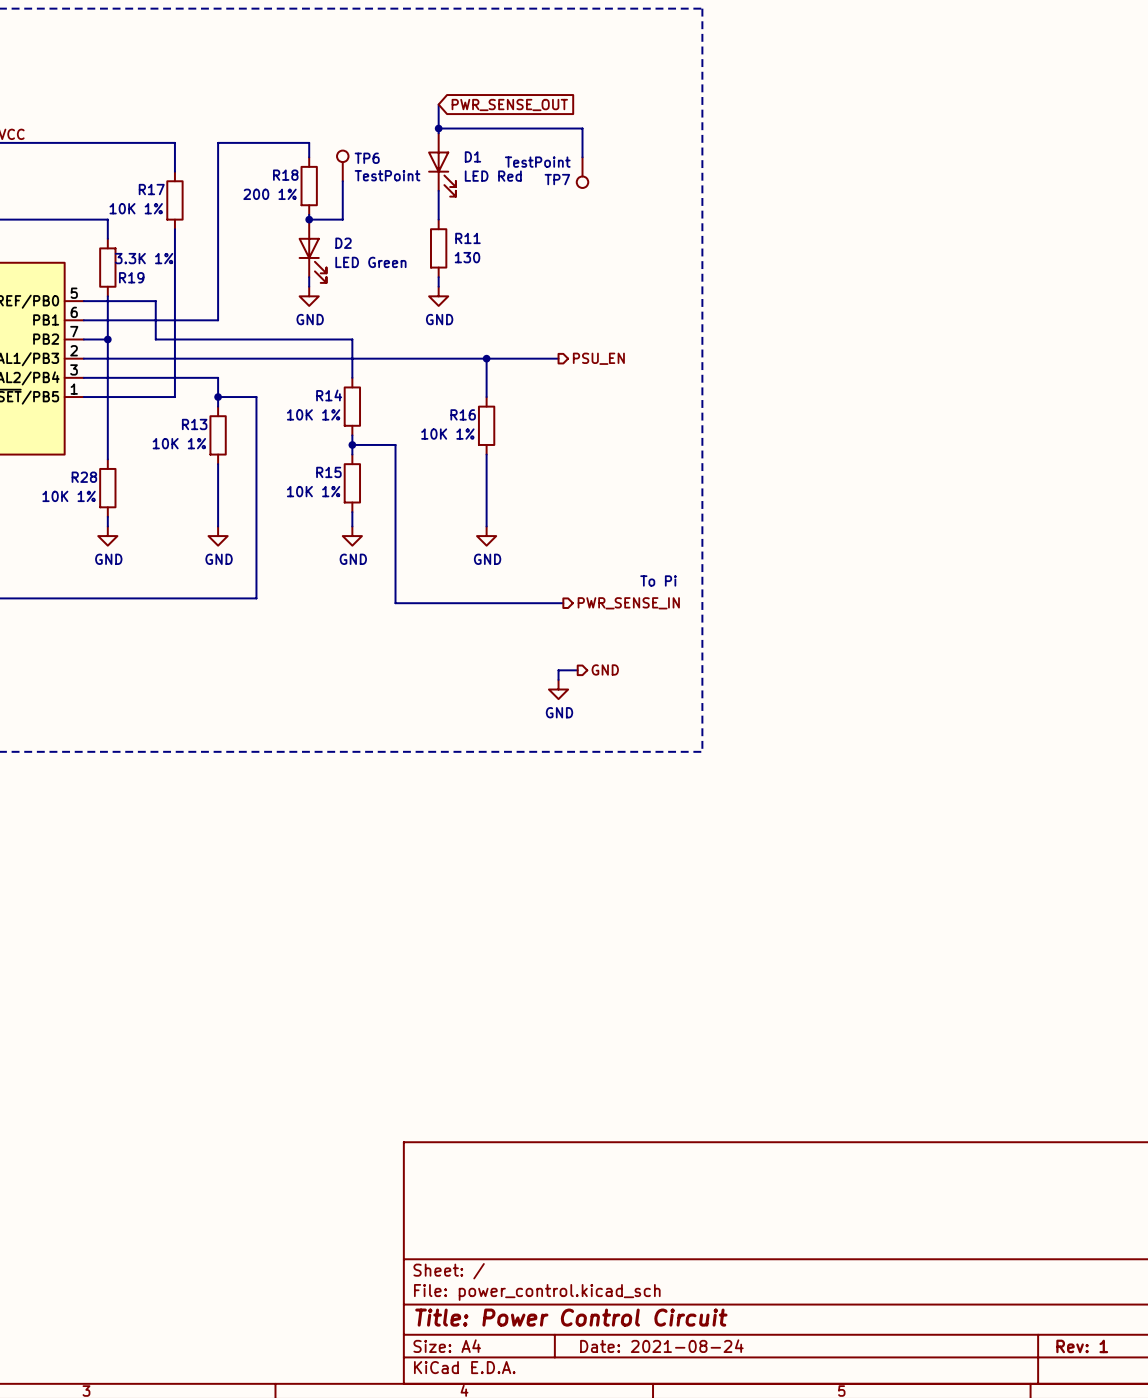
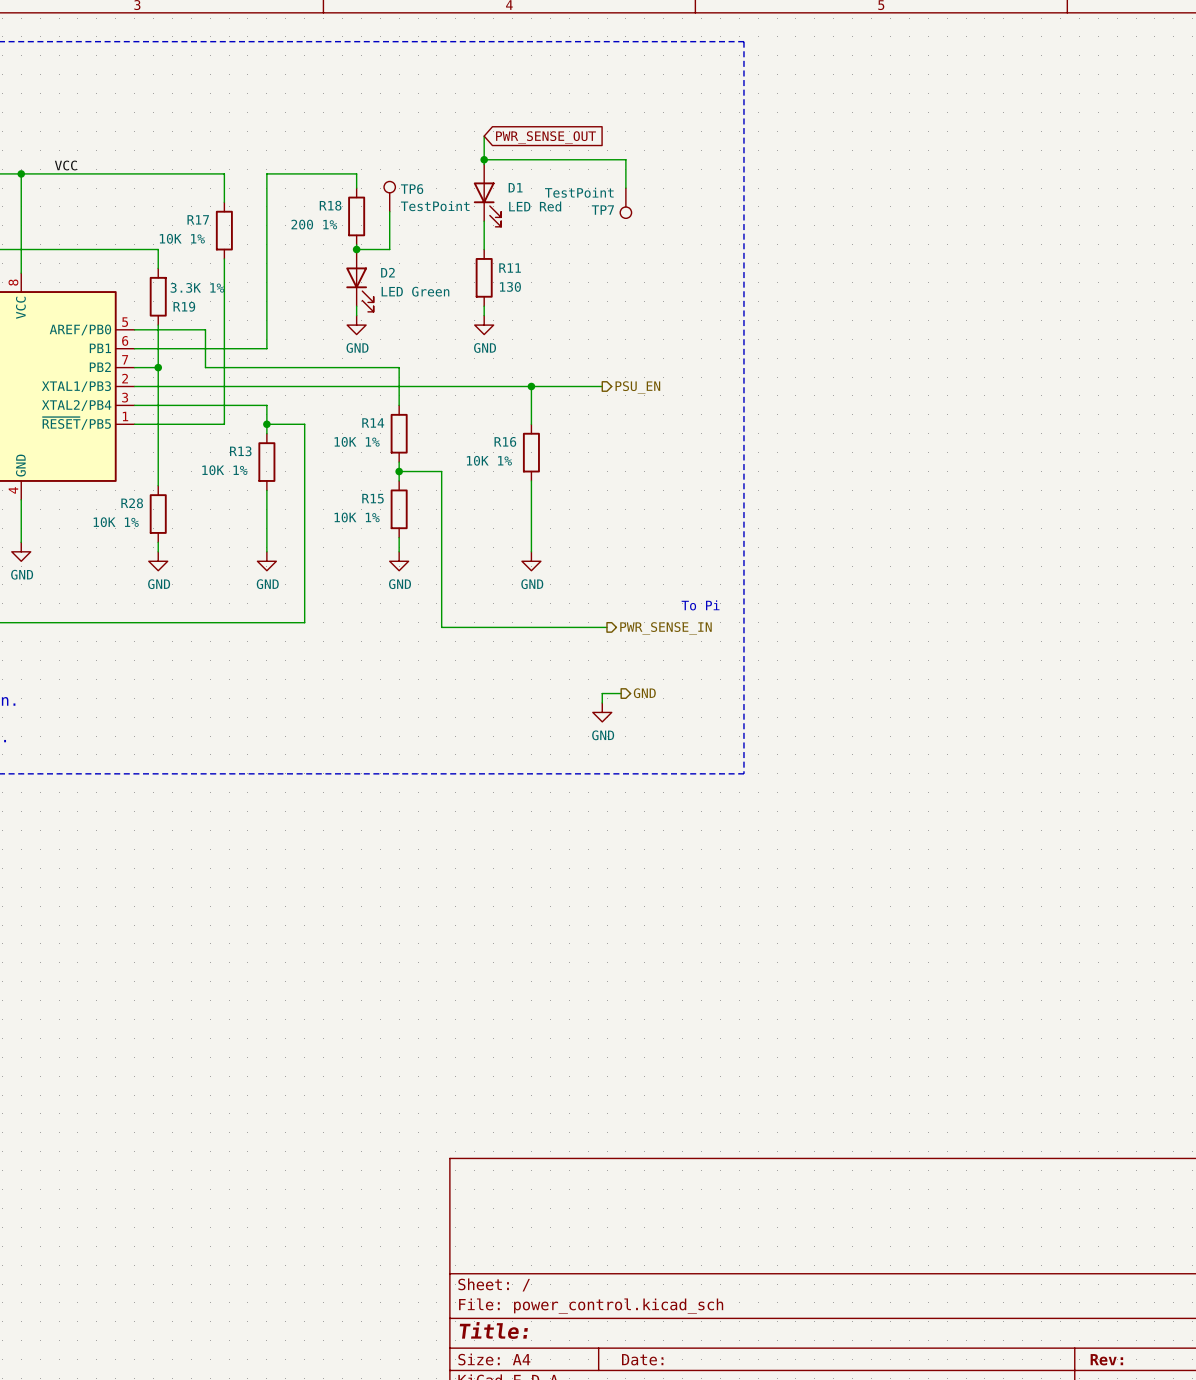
title block: Title: Power Control Circuit (571, 1317) -> Title: (493, 1330)
title block: Date: 2021-08-24 (661, 1346) -> Date: (642, 1359)
title block: Rev: 1 (1082, 1346) -> Rev: (1106, 1359)

